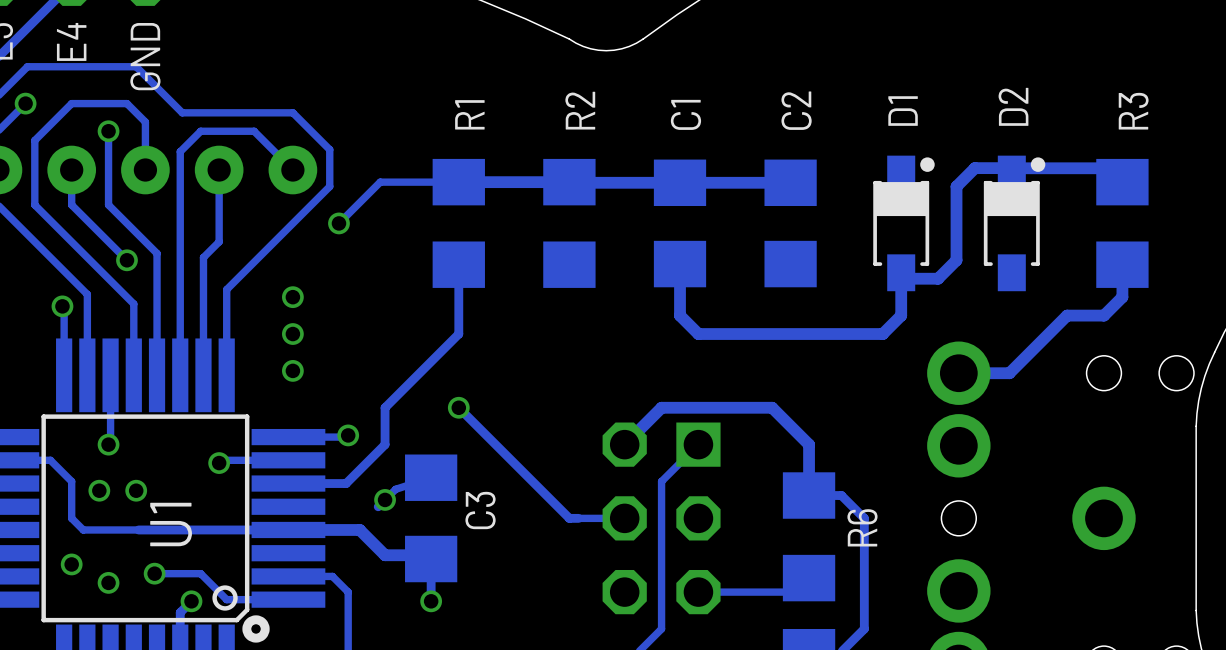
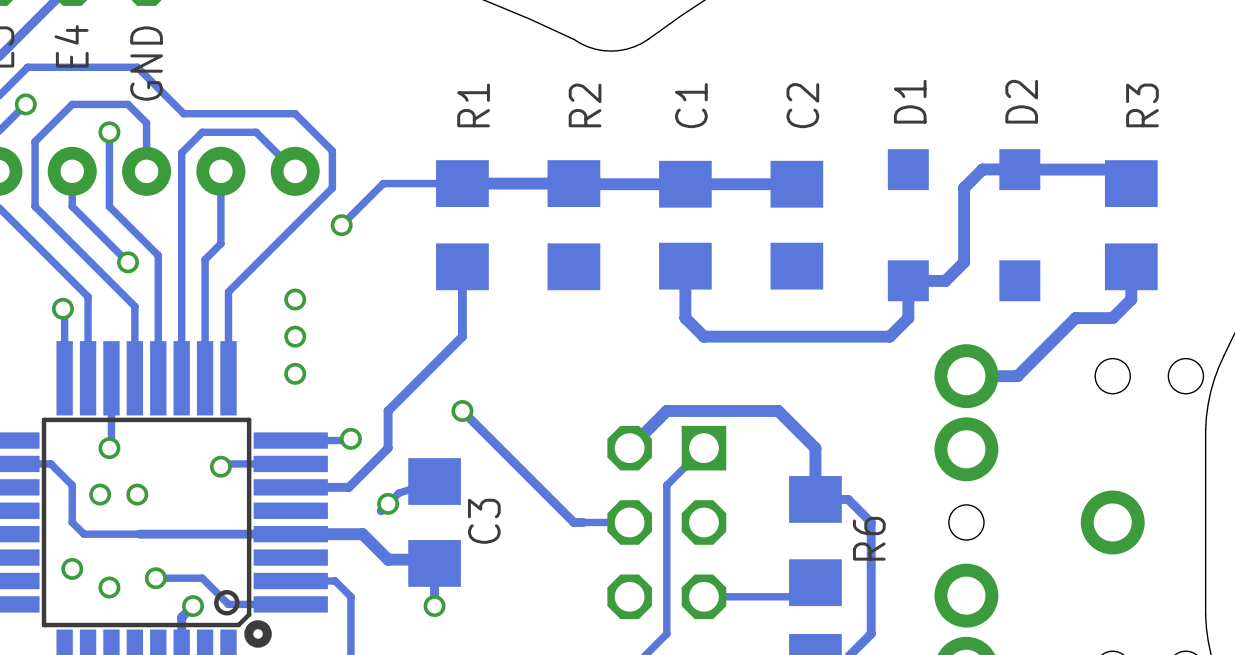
D1 footprint: [873, 155, 935, 292] -> [887, 149, 929, 302]
D2 footprint: [983, 155, 1046, 292] -> [999, 149, 1041, 302]
part value: U1 (171, 524) -> none

